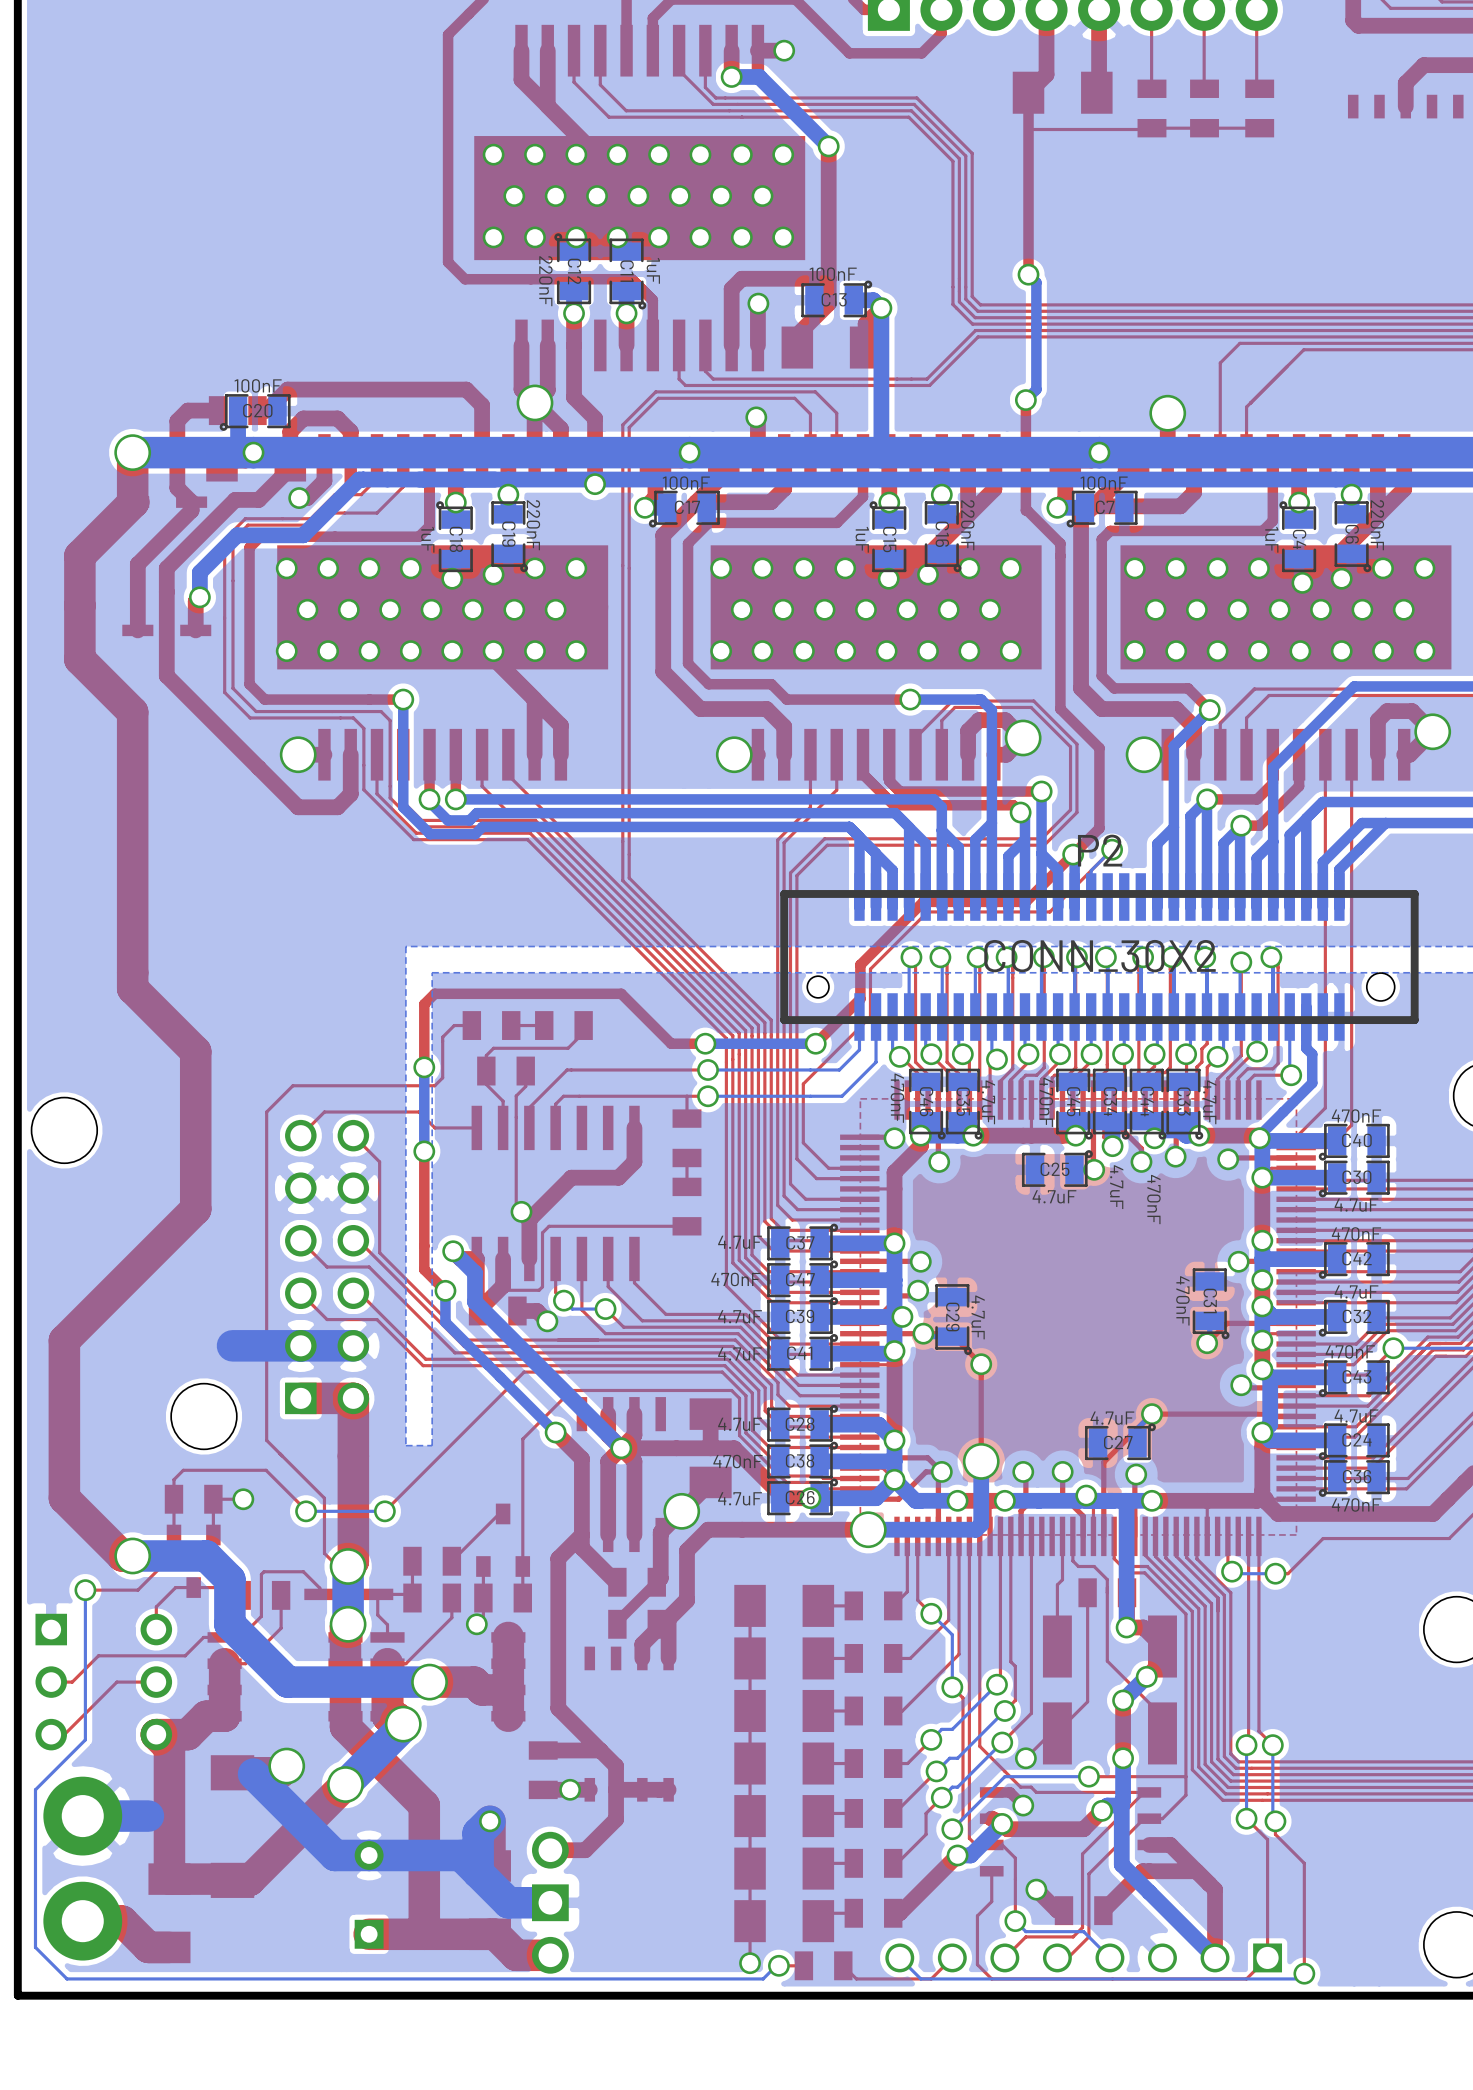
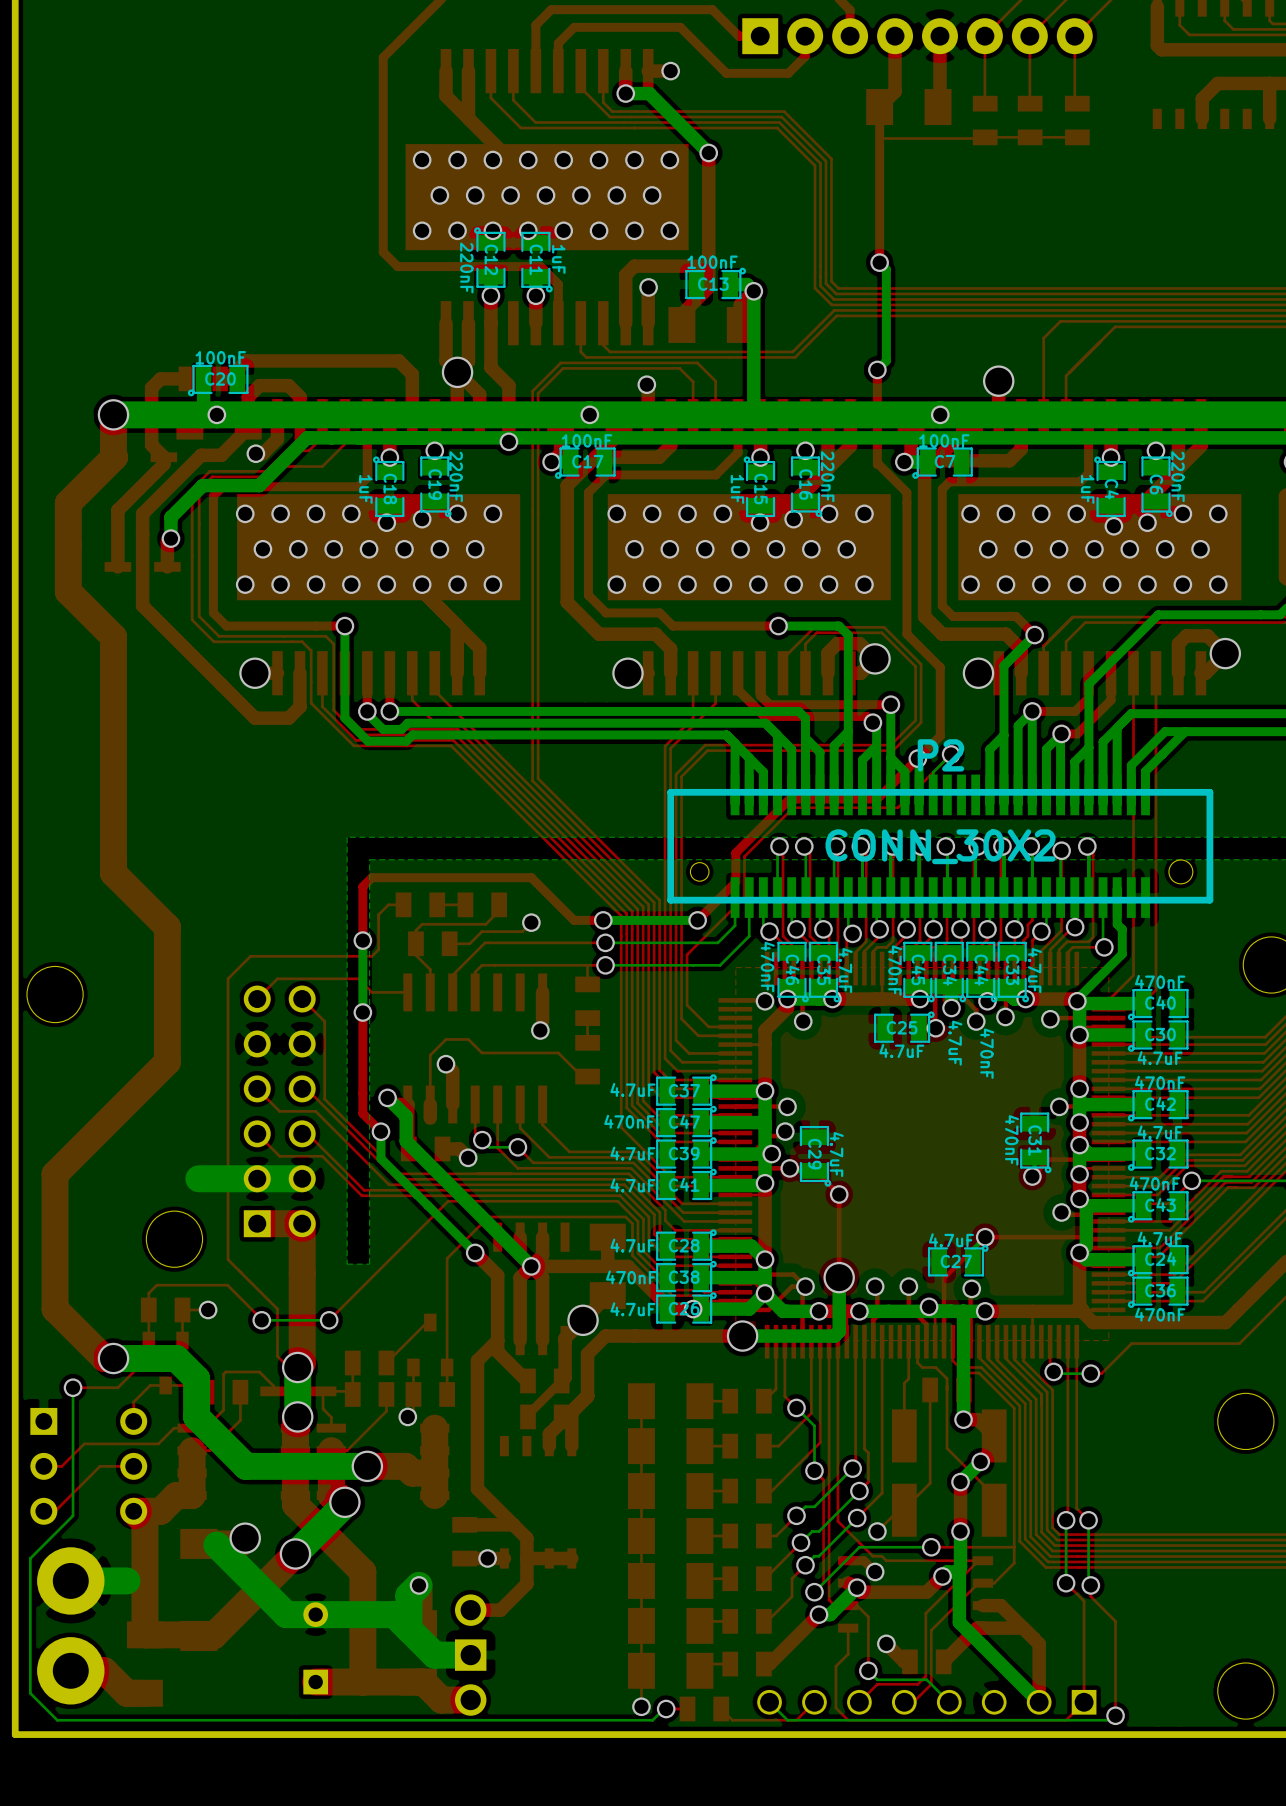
via: none -> (531, 922)
top track: (525, 1071) (525, 1086) (516, 1095) (516, 1206) (529, 1219) (571, 1177) (618, 1177) (634, 1161) -> (449, 943) (469, 943) (481, 931) (522, 931) (531, 922)
via: none -> (540, 1030)
top track: (680, 1226) (549, 1226) (542, 1232) (542, 1286) (539, 1290) (498, 1290) (478, 1310) (503, 1285) (503, 1274) -> (581, 1076) (558, 1052) (481, 1052) (468, 1039) (446, 1039) (430, 1055) (430, 1104)

